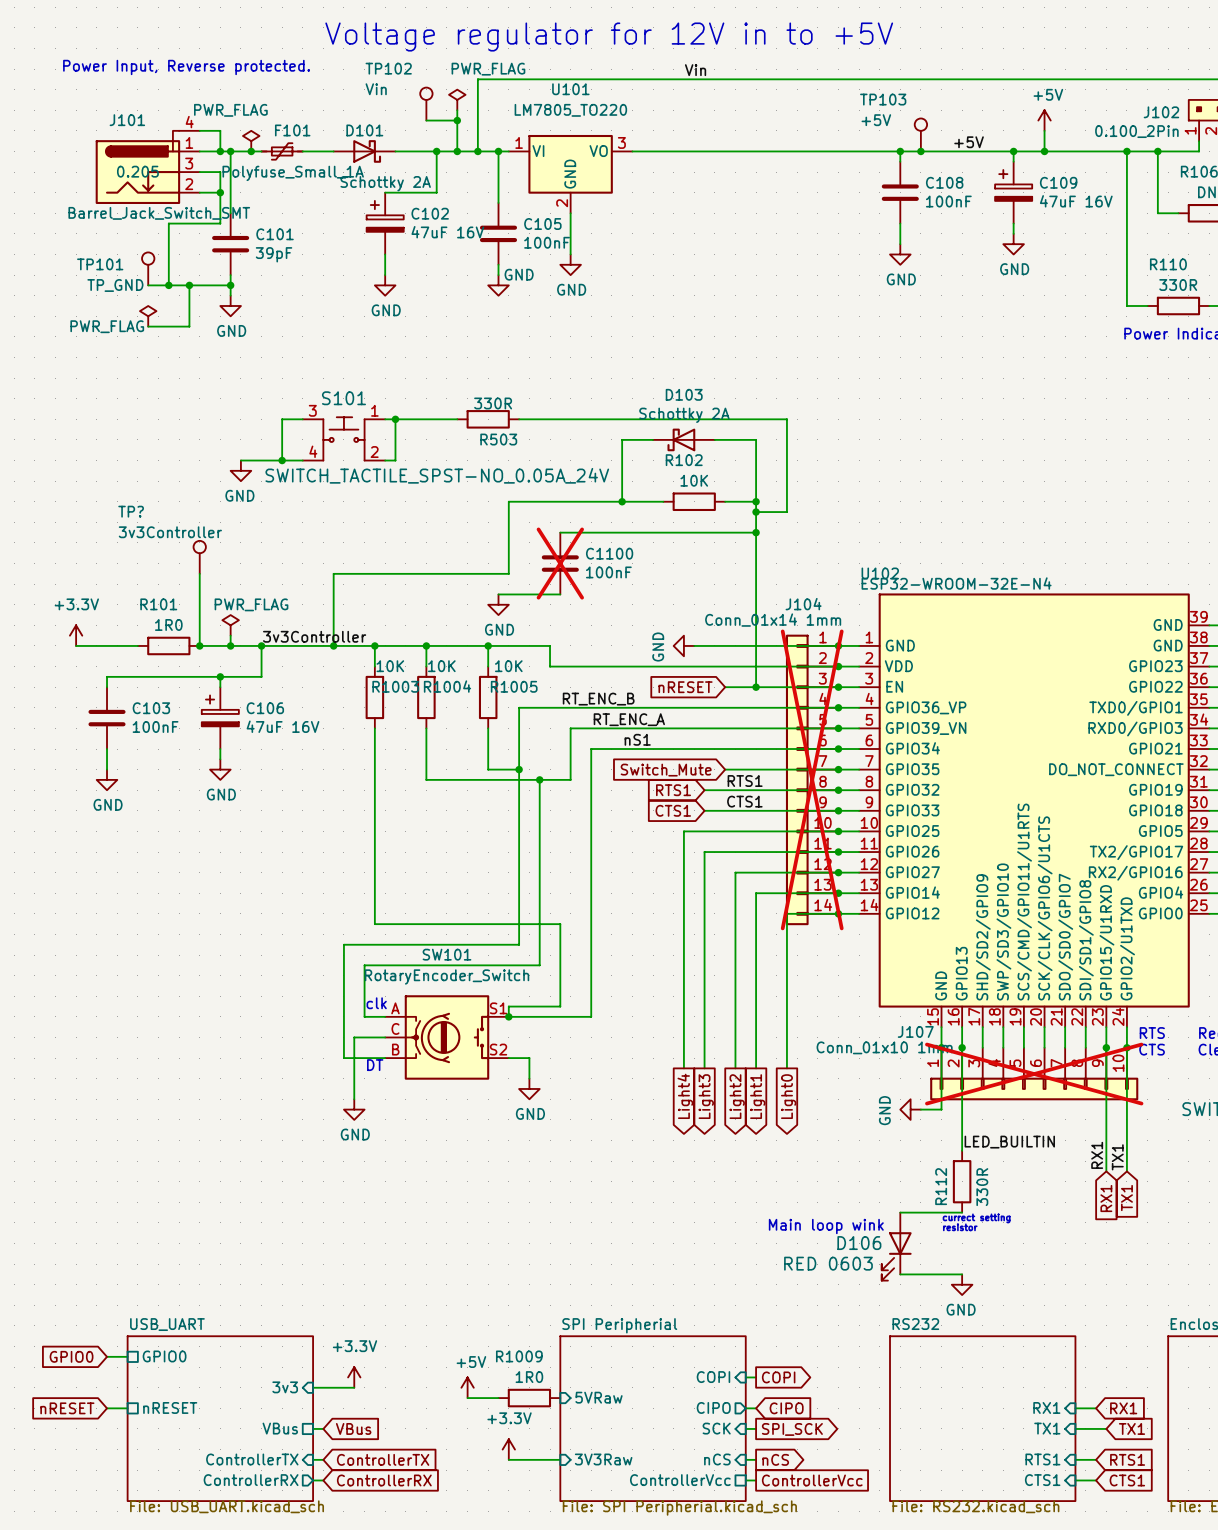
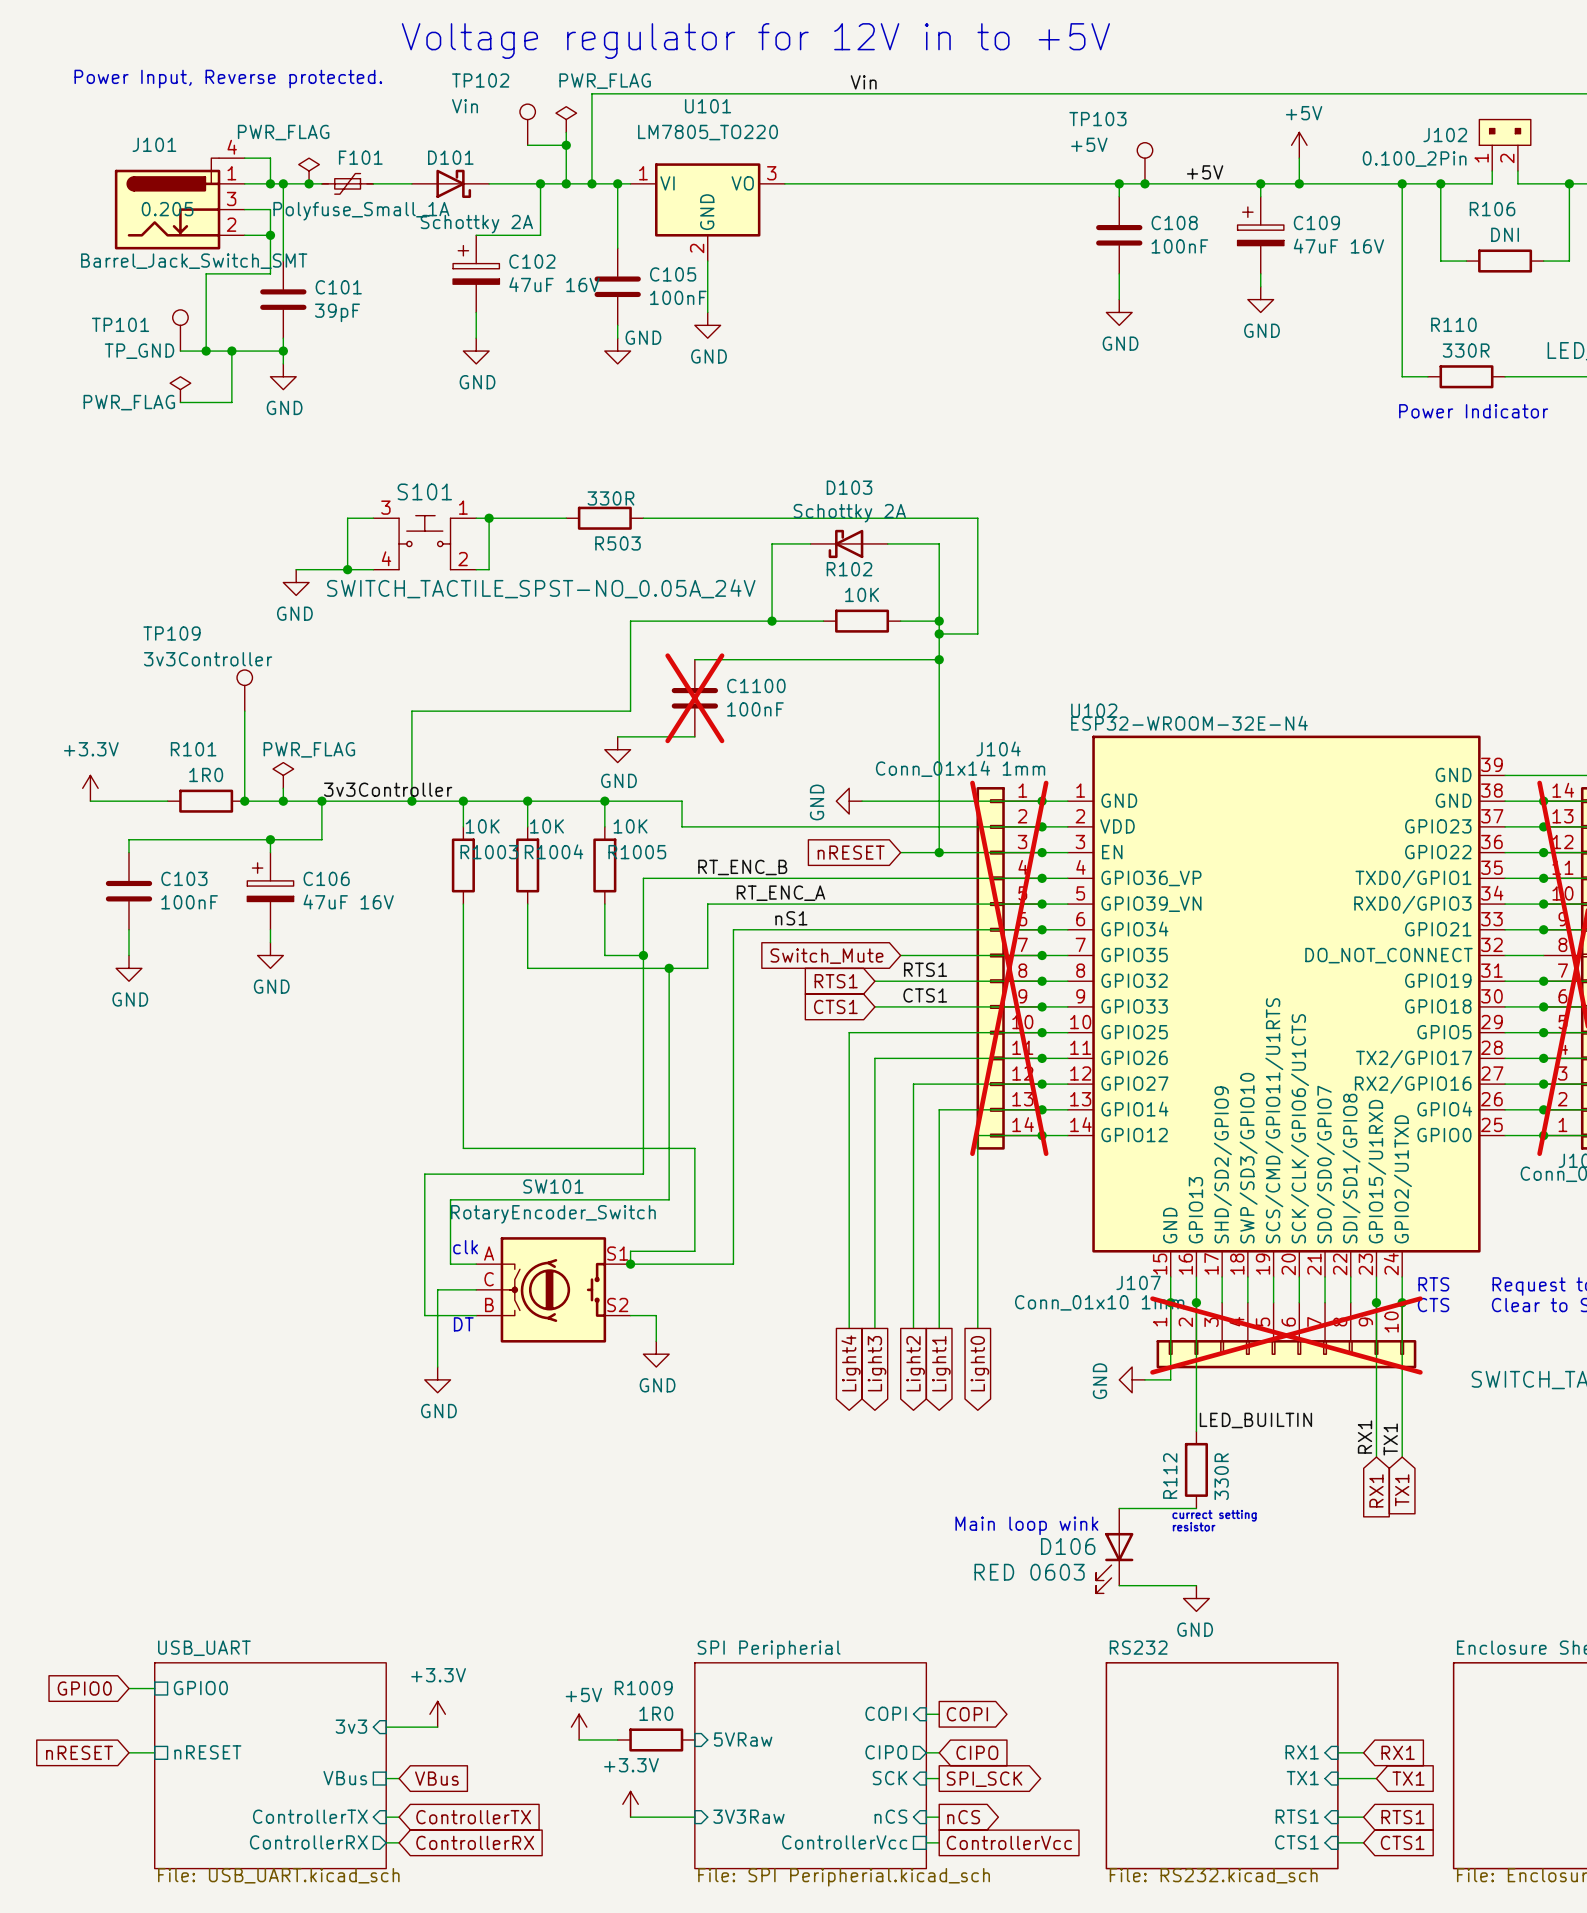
TP? name: TP? (131, 511) -> TP109 (171, 633)

